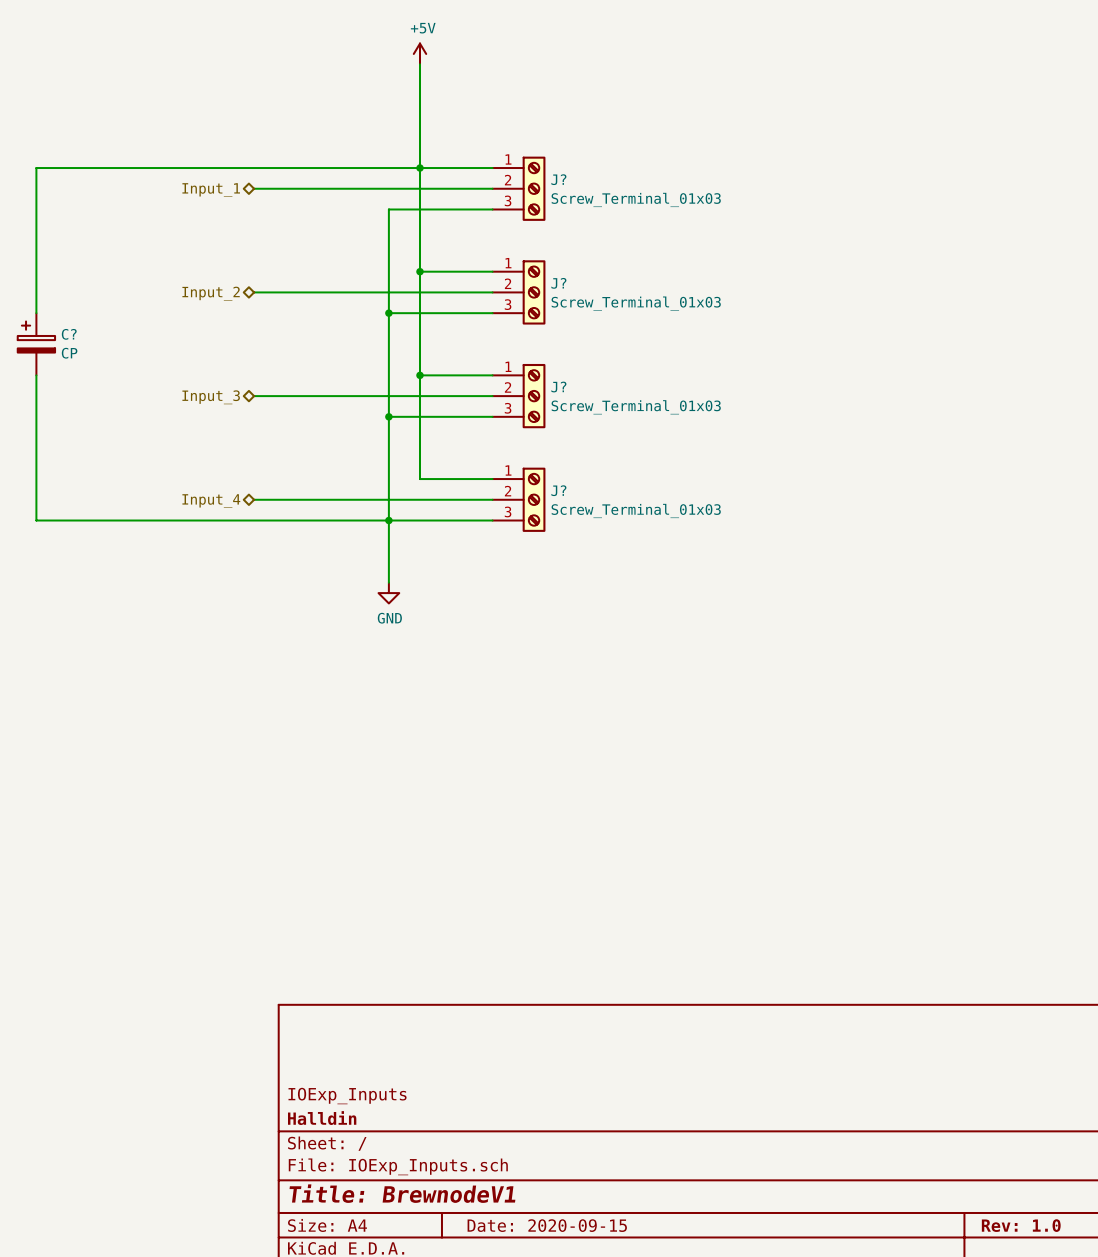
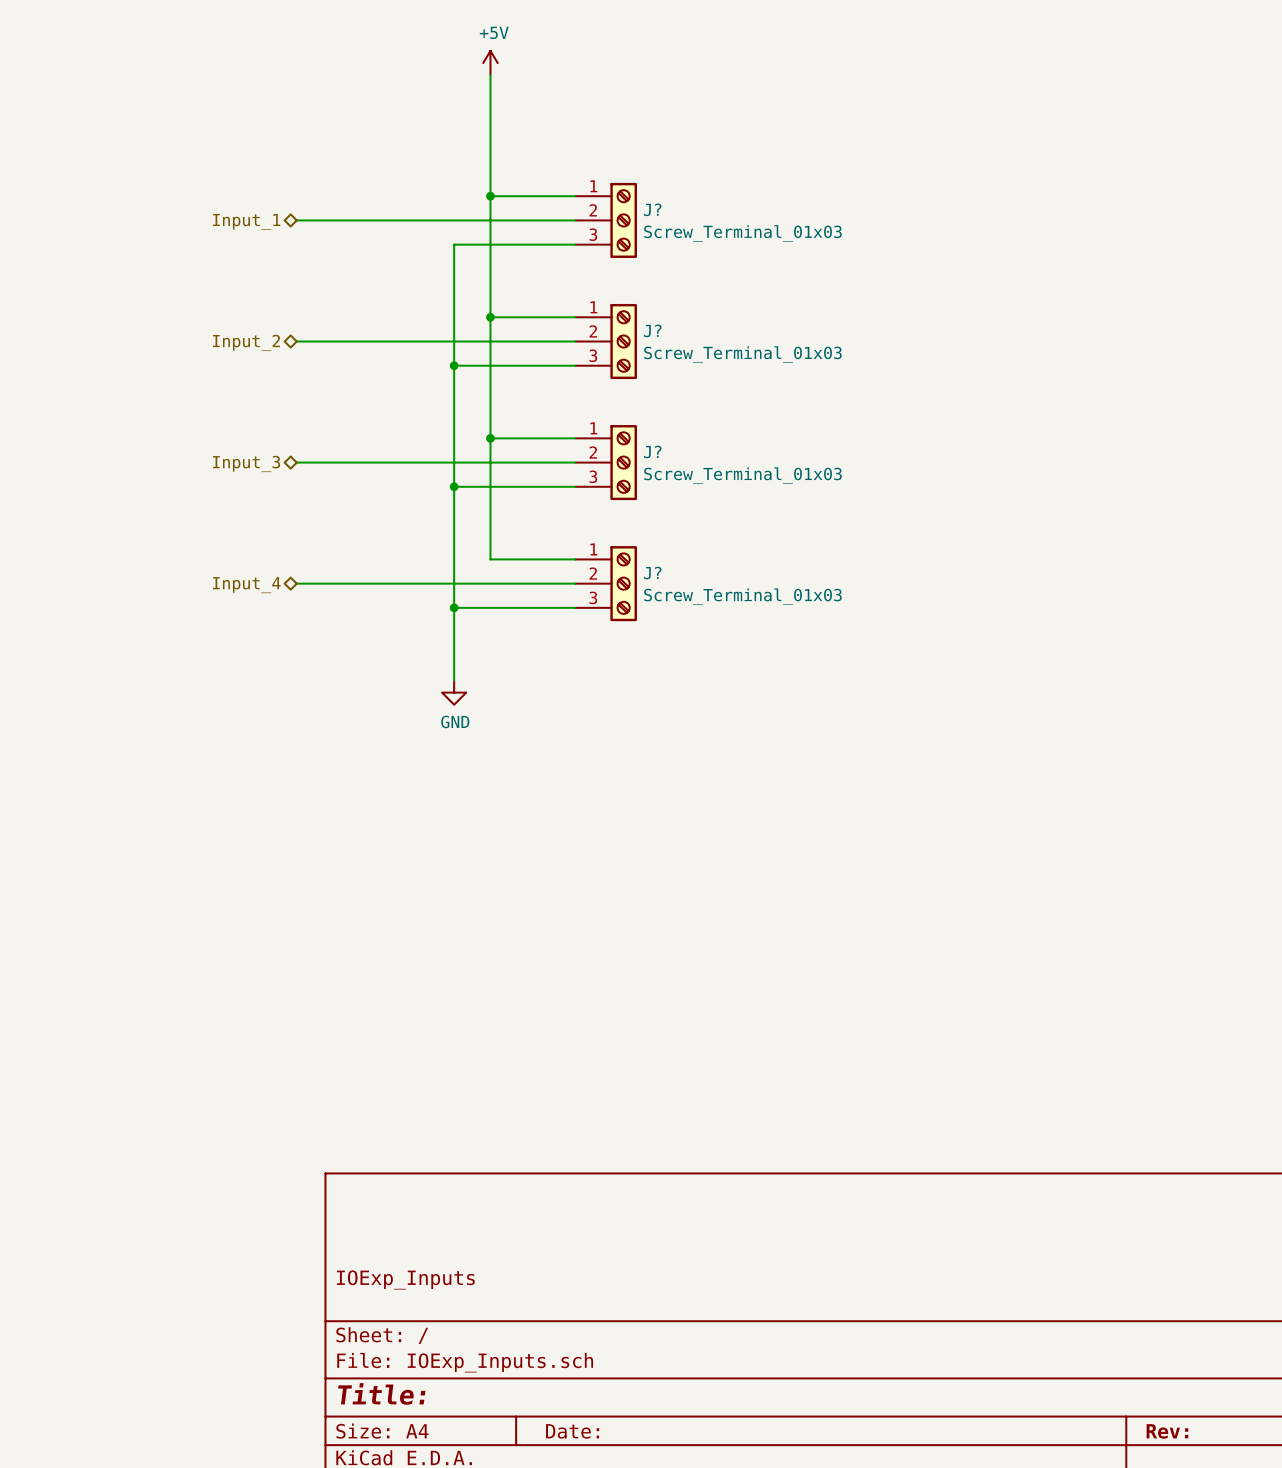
wire: (420, 168) (36, 168) (36, 313) -> none
C?: CP (36, 344) -> none
wire: (36, 375) (36, 520) (388, 520) -> none
title block: Halldin (322, 1118) -> none
title block: Title: BrewnodeV1 (402, 1193) -> Title: (381, 1393)
title block: Date: 2020-09-15 (547, 1225) -> Date: (572, 1431)
title block: Rev: 1.0 (1021, 1225) -> Rev: (1167, 1431)

